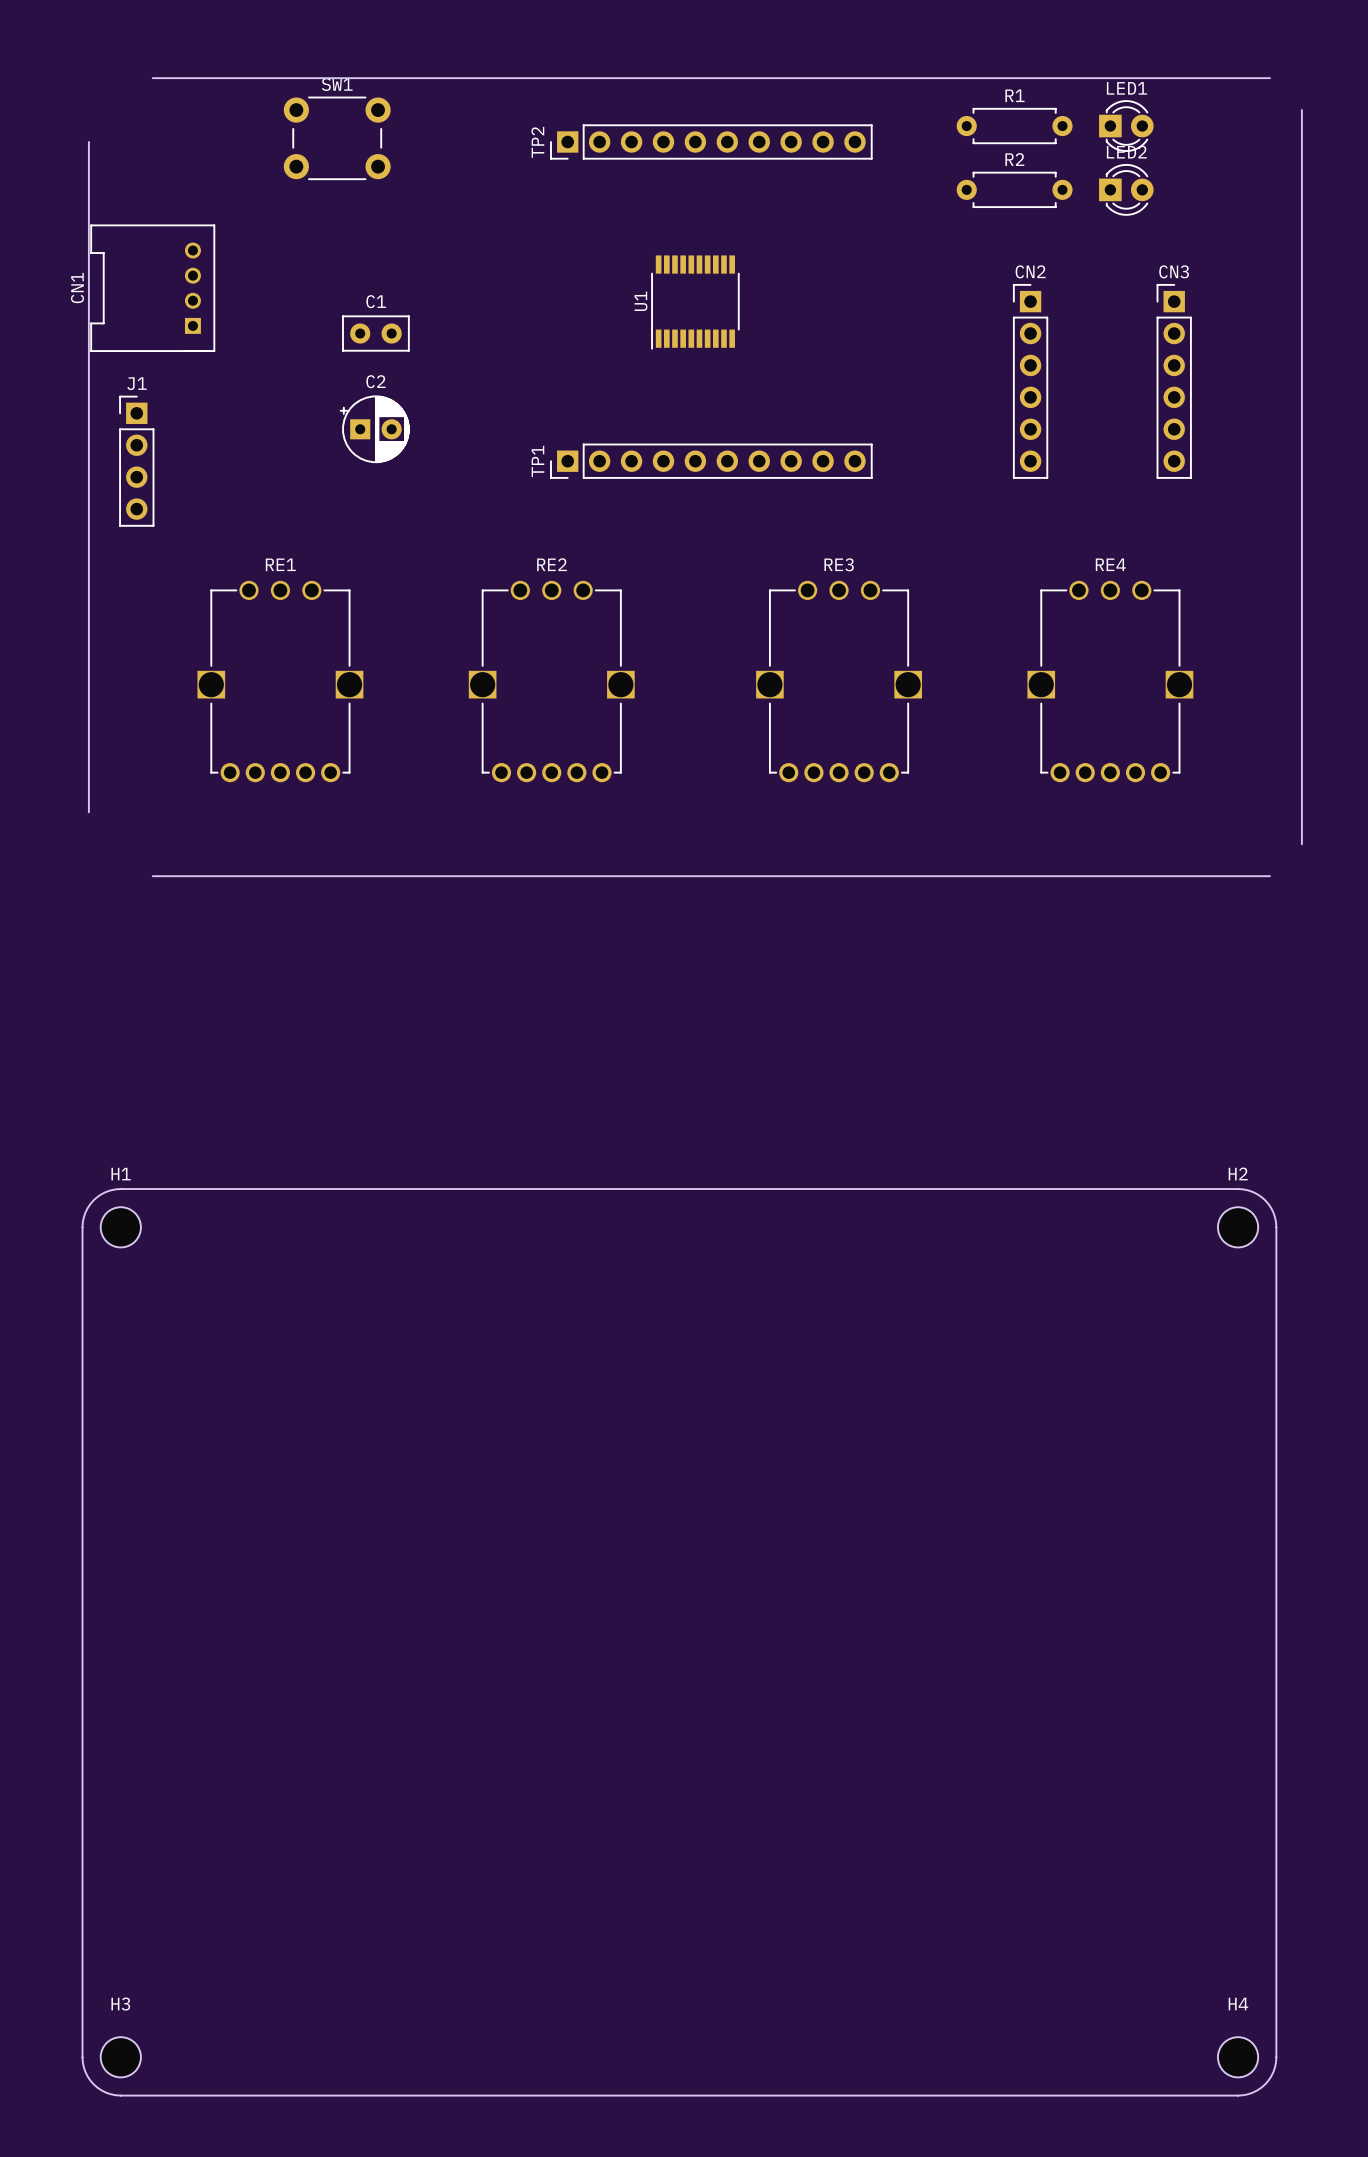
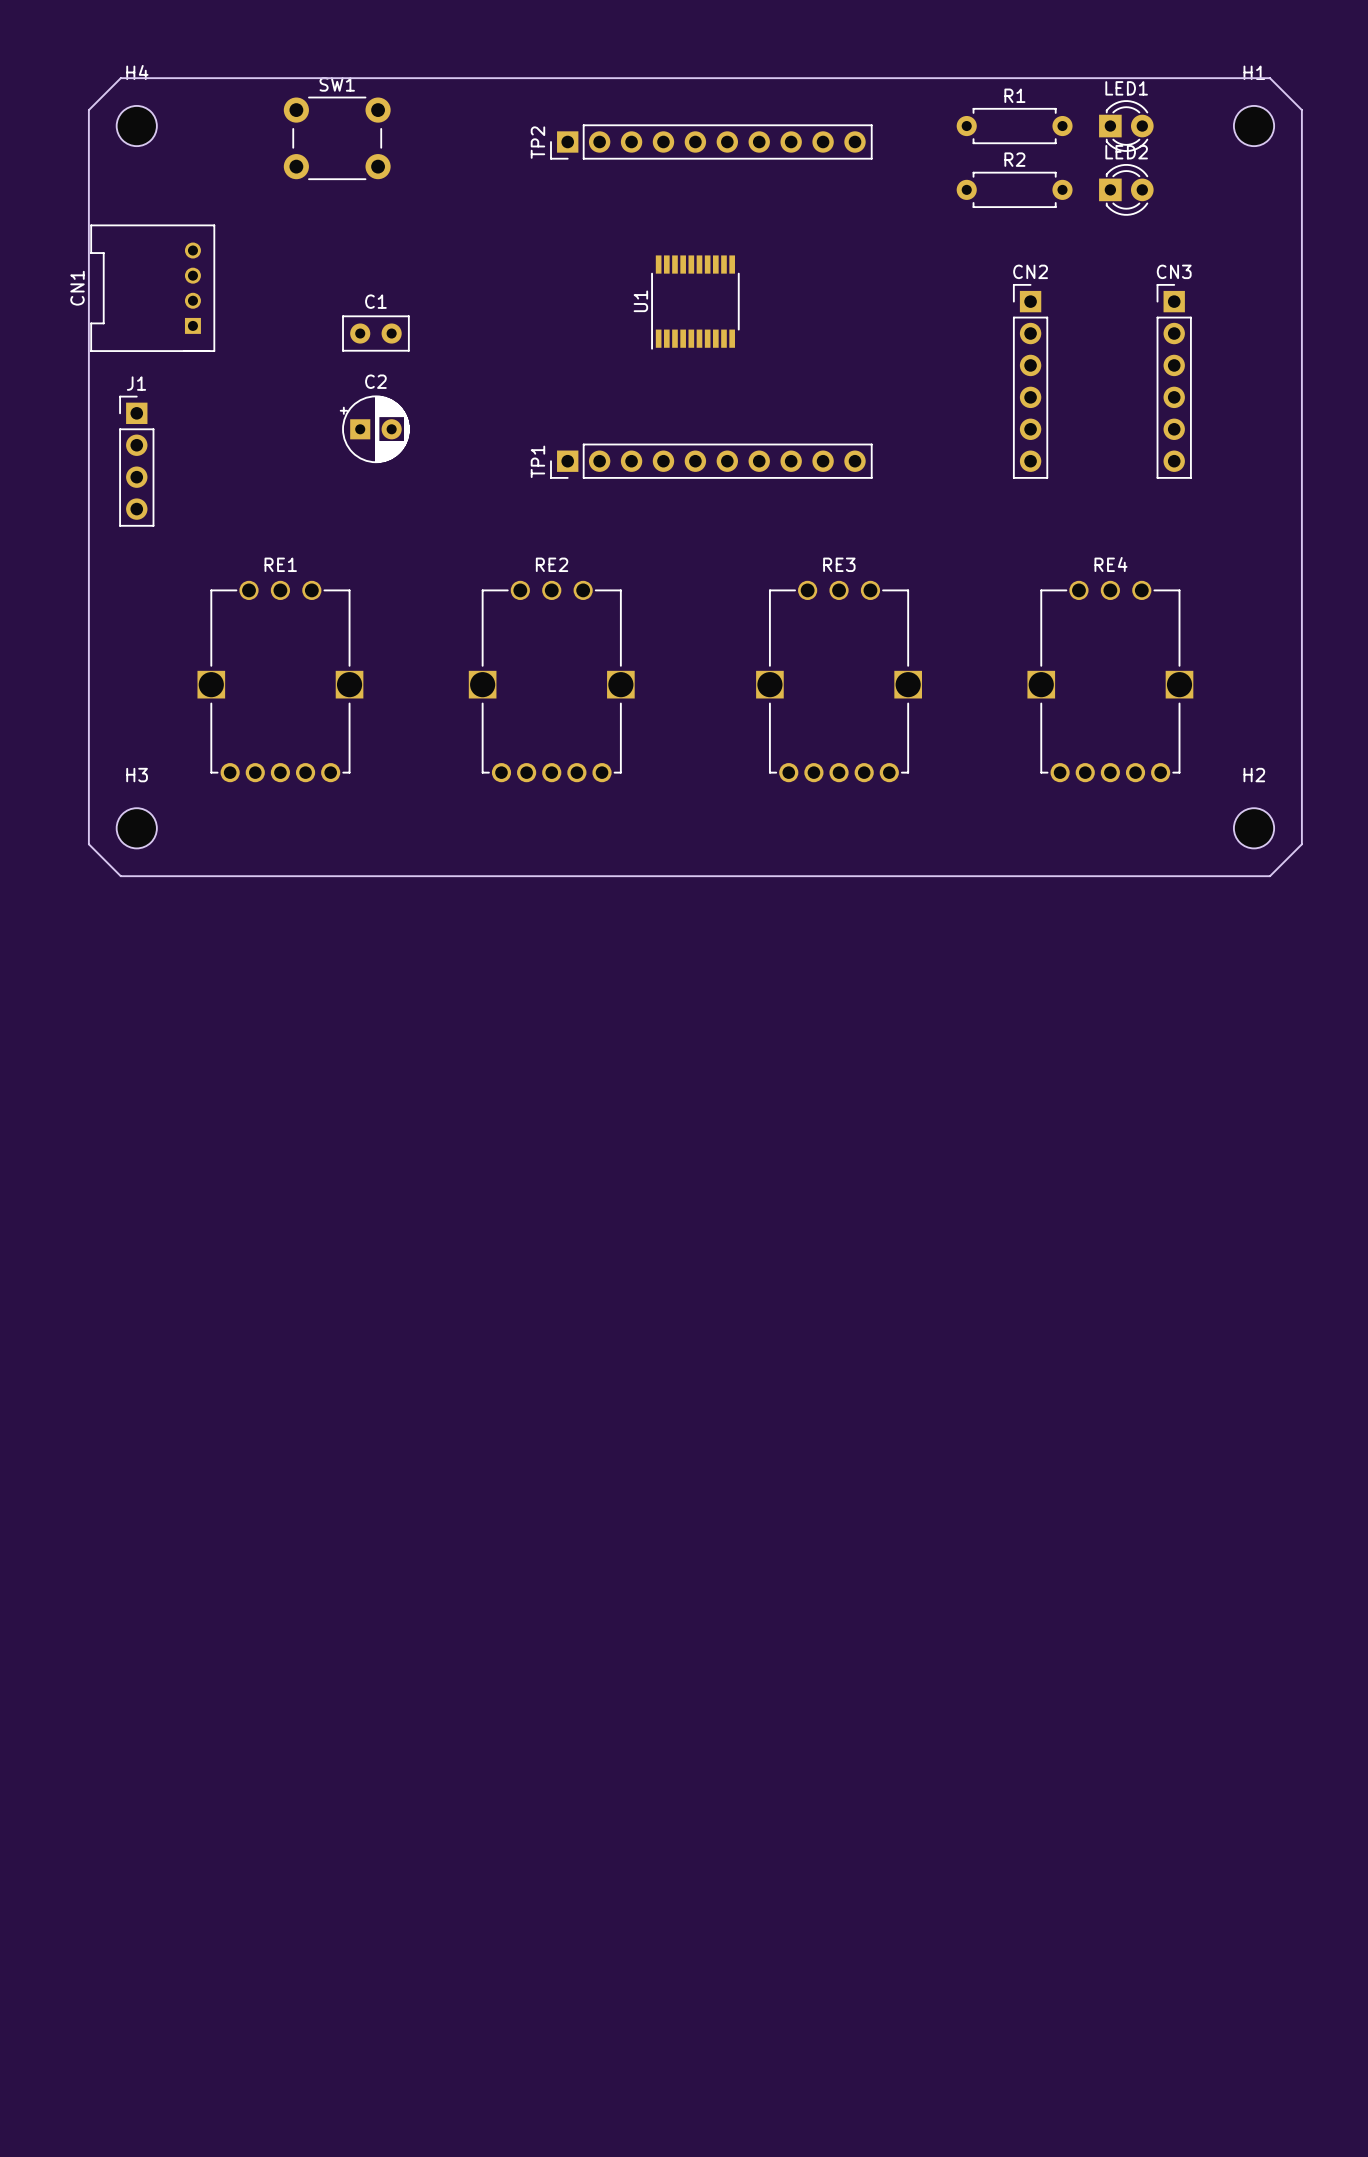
board edge: none -> (152, 78) (120, 78) (88, 110) (88, 141)
board edge: none -> (1269, 78) (1301, 110)
board edge: none -> (88, 812) (88, 844) (120, 876) (152, 876)
board edge: none -> (1301, 844) (1269, 876)
board edge: (120, 1189) (1238, 1189) (1247, 1190) (1261, 1196) (1273, 1212) (1276, 1227) (1276, 2057) (1275, 2067) (1268, 2080) (1252, 2092) (1238, 2095) (120, 2095) (110, 2094) (97, 2087) (85, 2071) (82, 2057) (82, 1227) (85, 1212) (93, 1200) (106, 1191) (120, 1189) -> none
H1 position: (120, 1227) -> (1254, 126)
H2 position: (1238, 1227) -> (1254, 828)
H3 position: (120, 2057) -> (136, 828)
H4 position: (1238, 2057) -> (136, 126)

